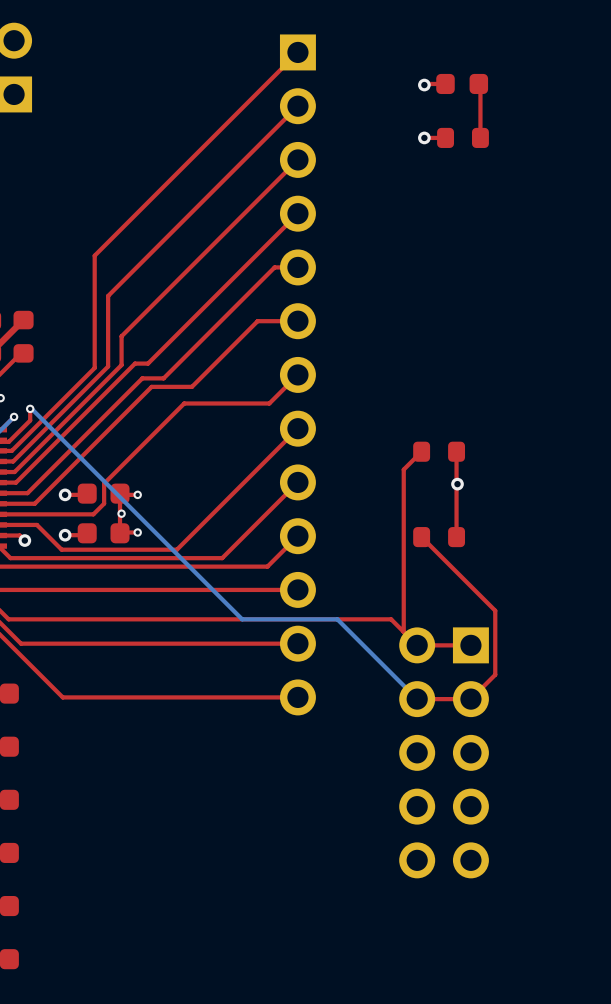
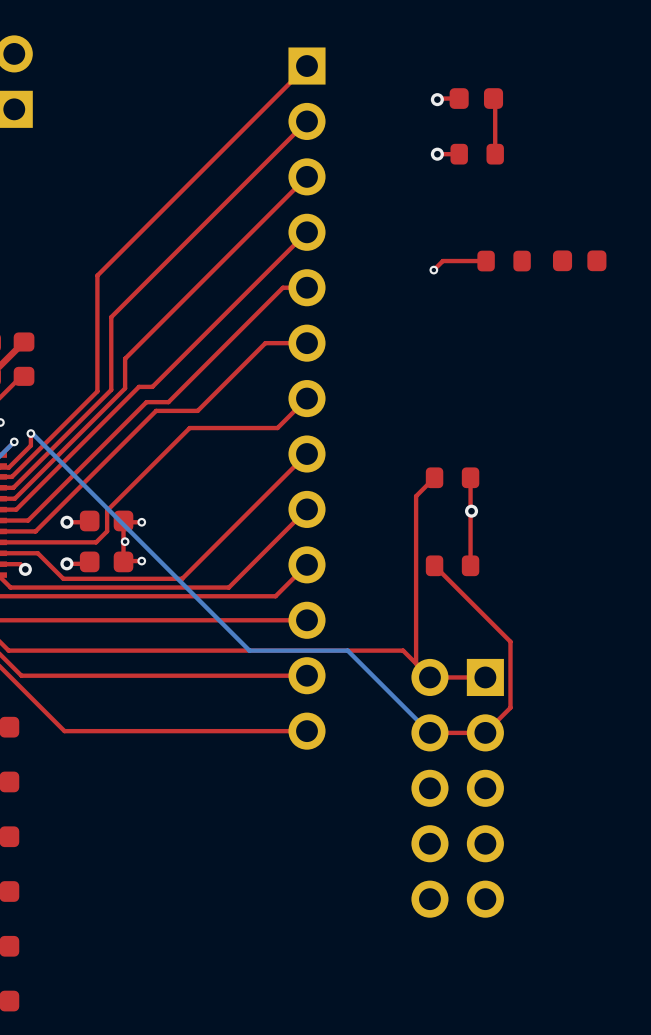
top track: none -> (486, 261) (442, 261) (433, 270)
part: none -> (504, 261)
part: none -> (579, 260)
via: none -> (433, 270)

